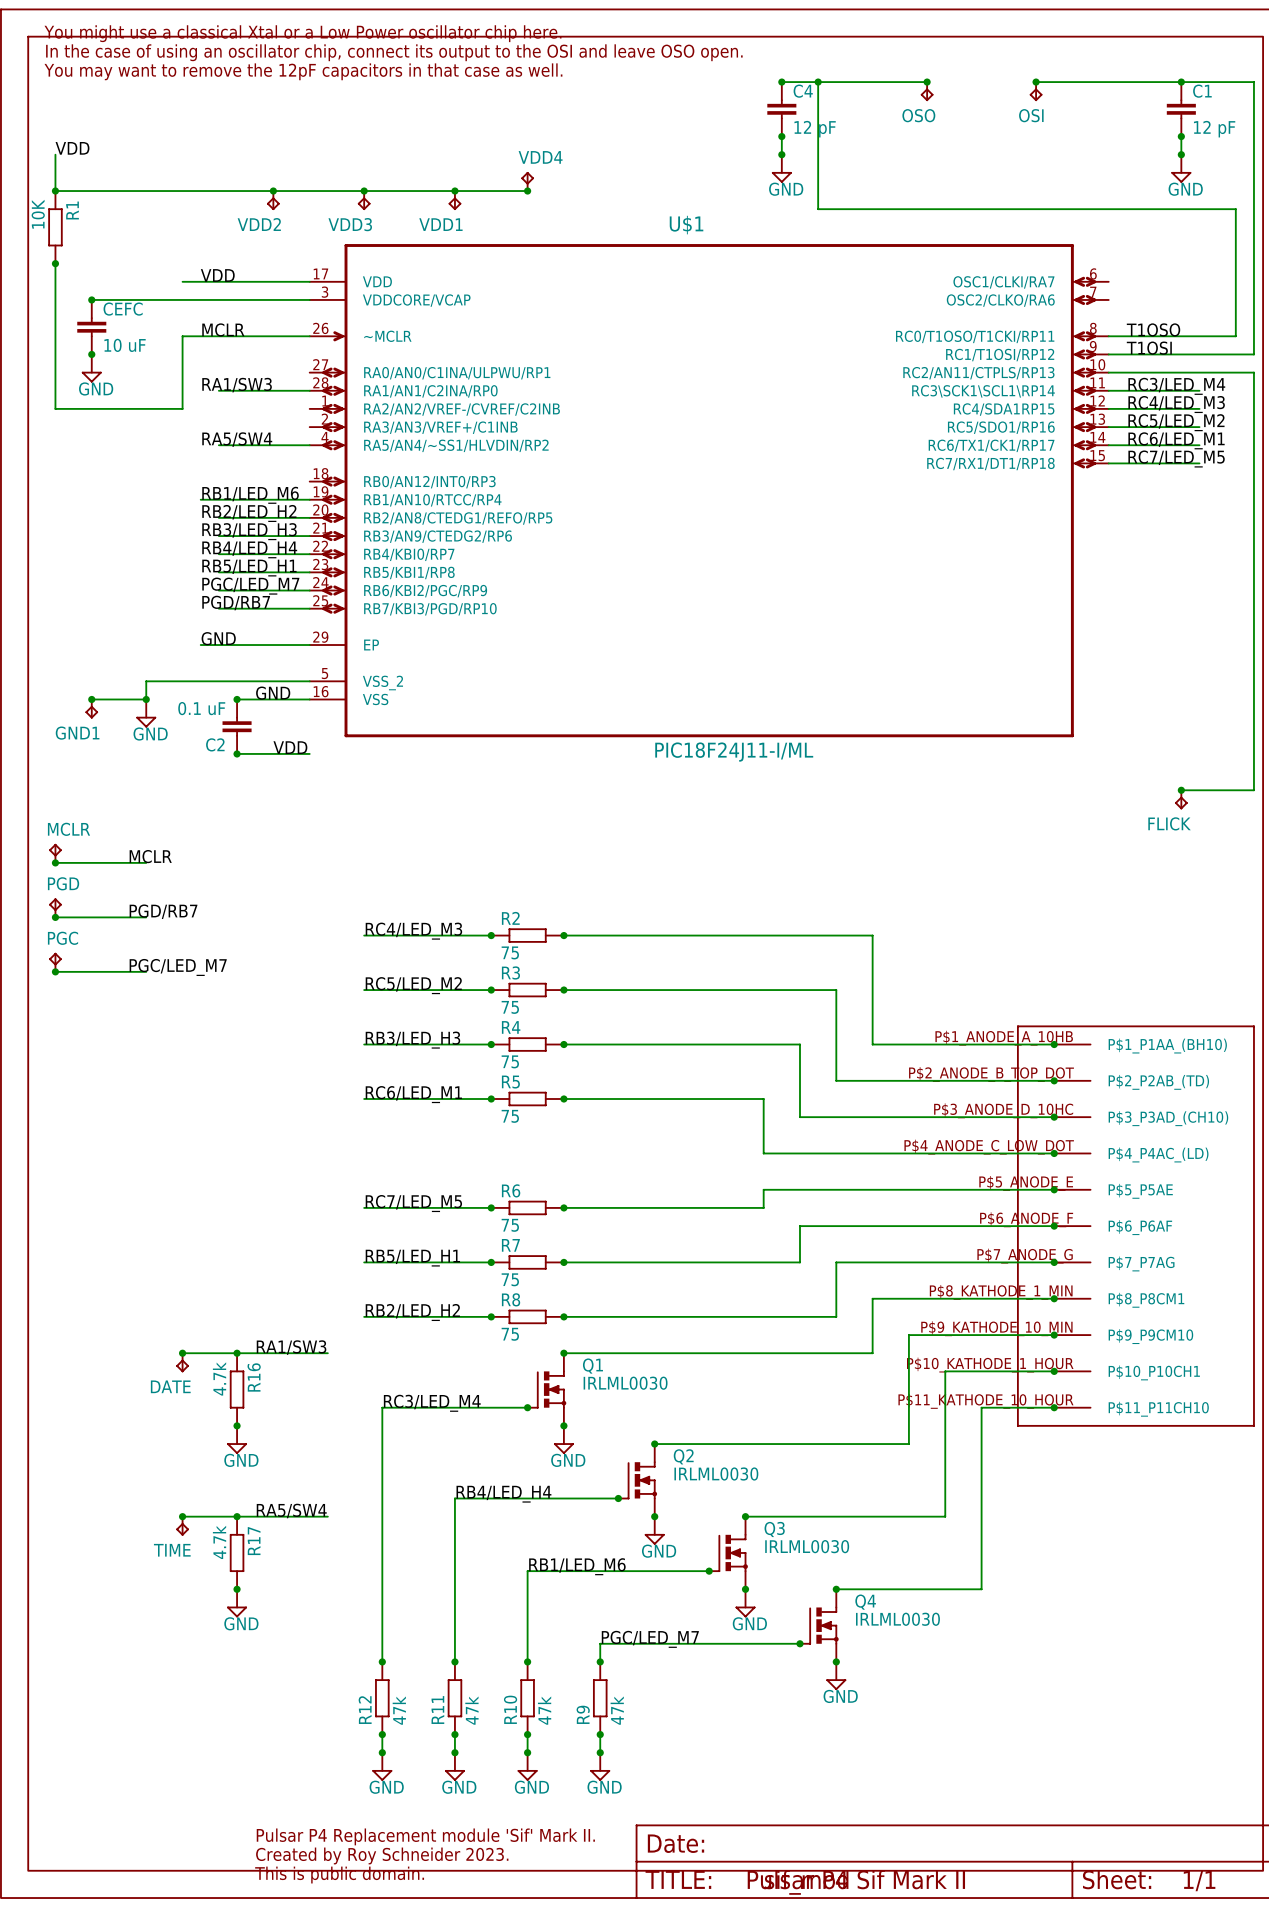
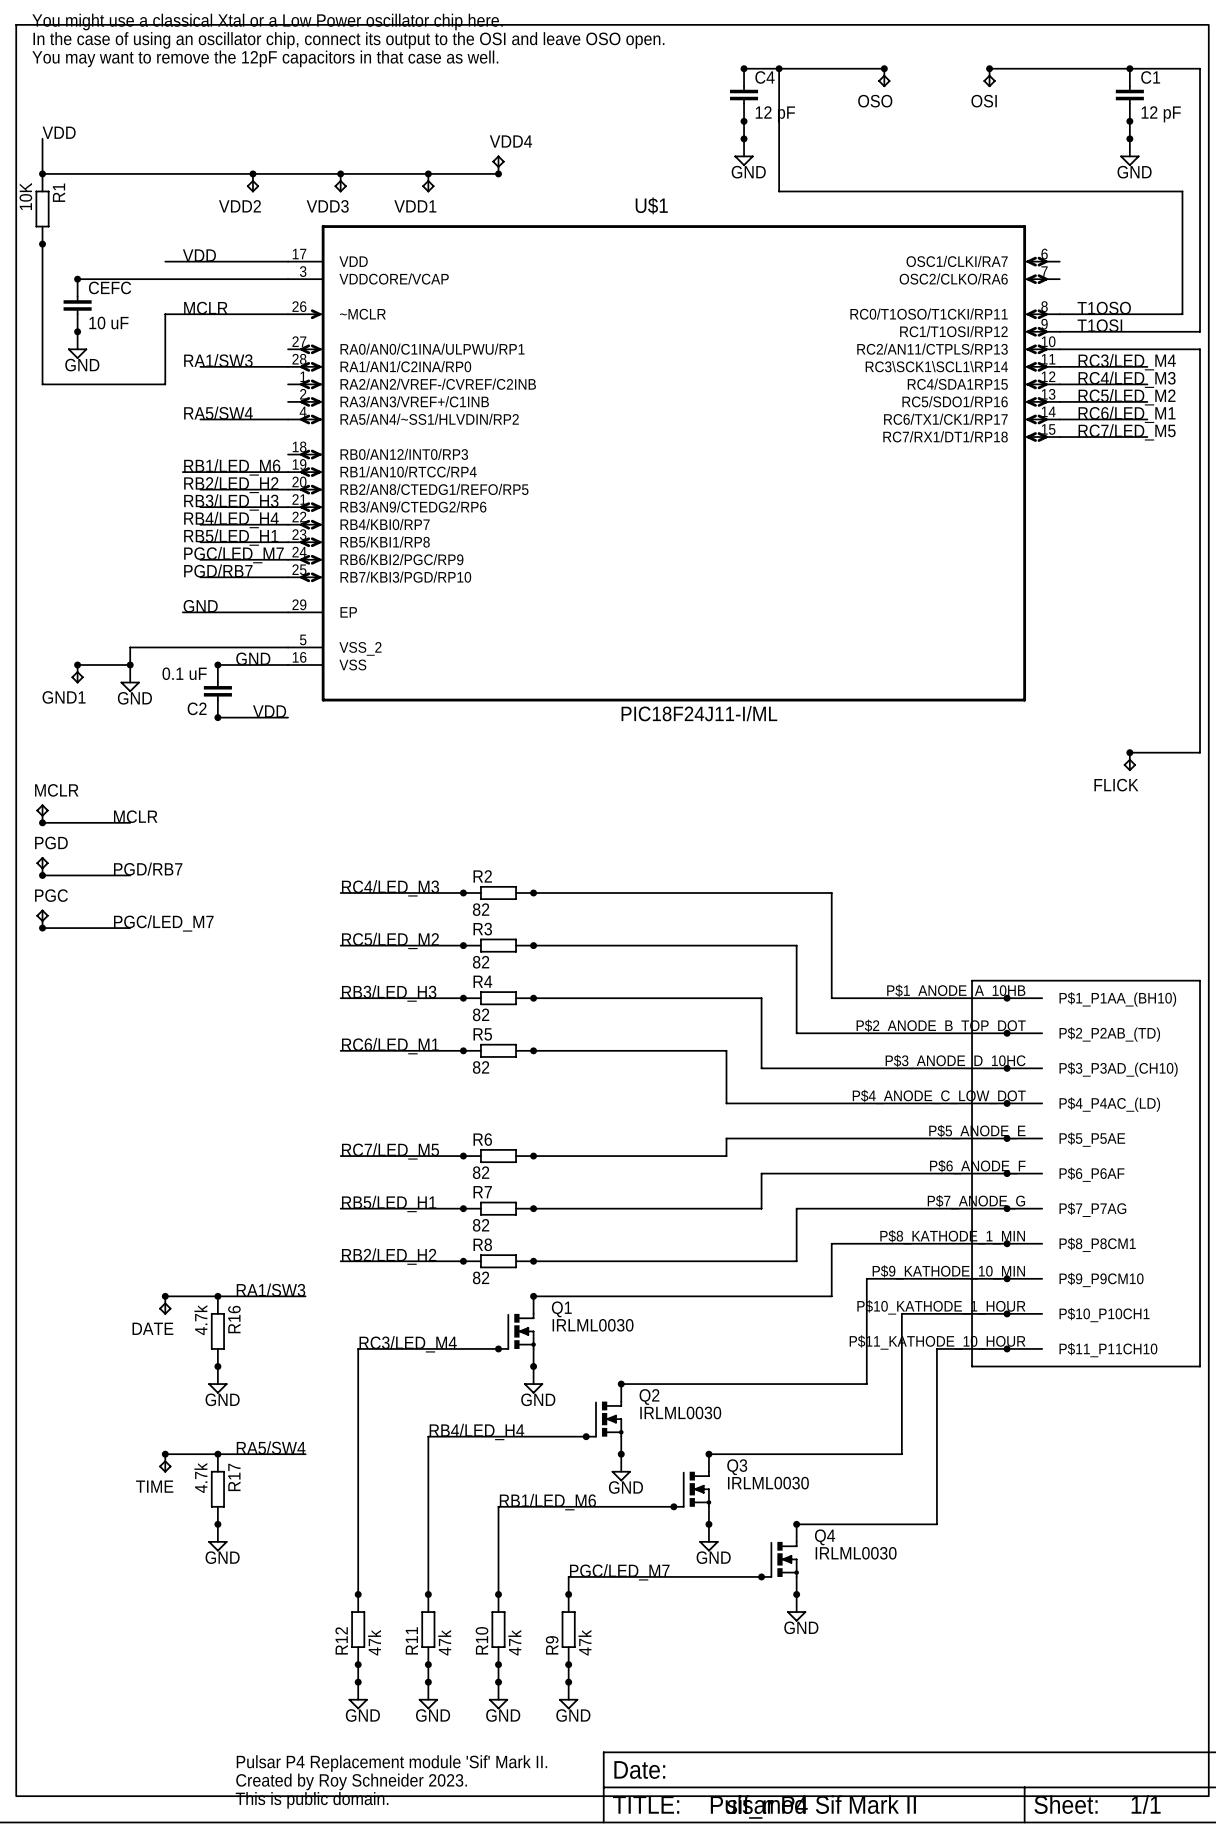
R2 value: 75 (510, 952) -> 82 (481, 909)
R3 value: 75 (510, 1007) -> 82 (481, 962)
R4 value: 75 (510, 1061) -> 82 (481, 1014)
R5 value: 75 (510, 1116) -> 82 (481, 1067)
R6 value: 75 (510, 1225) -> 82 (481, 1172)
R7 value: 75 (510, 1279) -> 82 (481, 1225)
R8 value: 75 (510, 1334) -> 82 (481, 1277)

